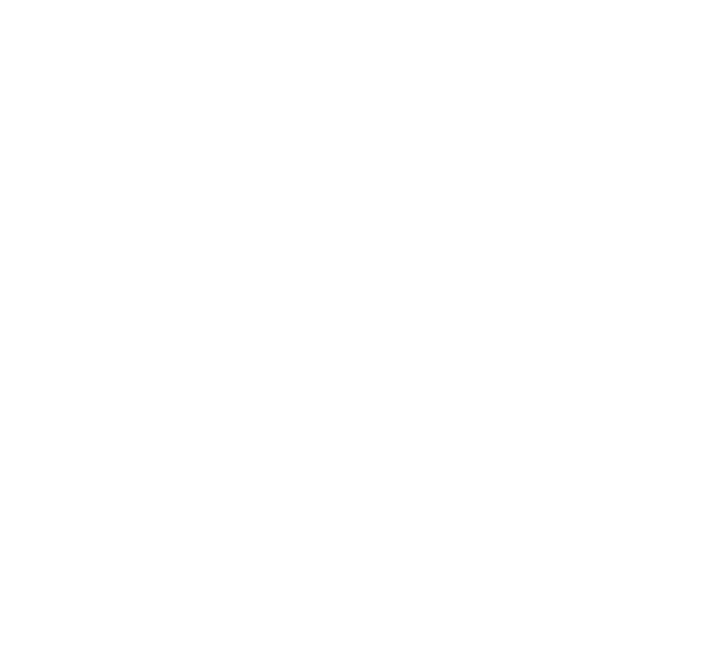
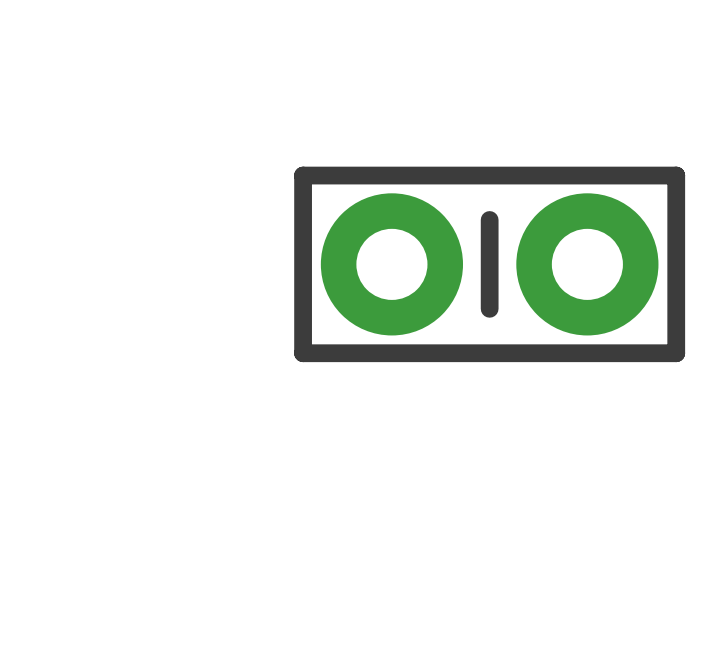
part: none -> (489, 264)

